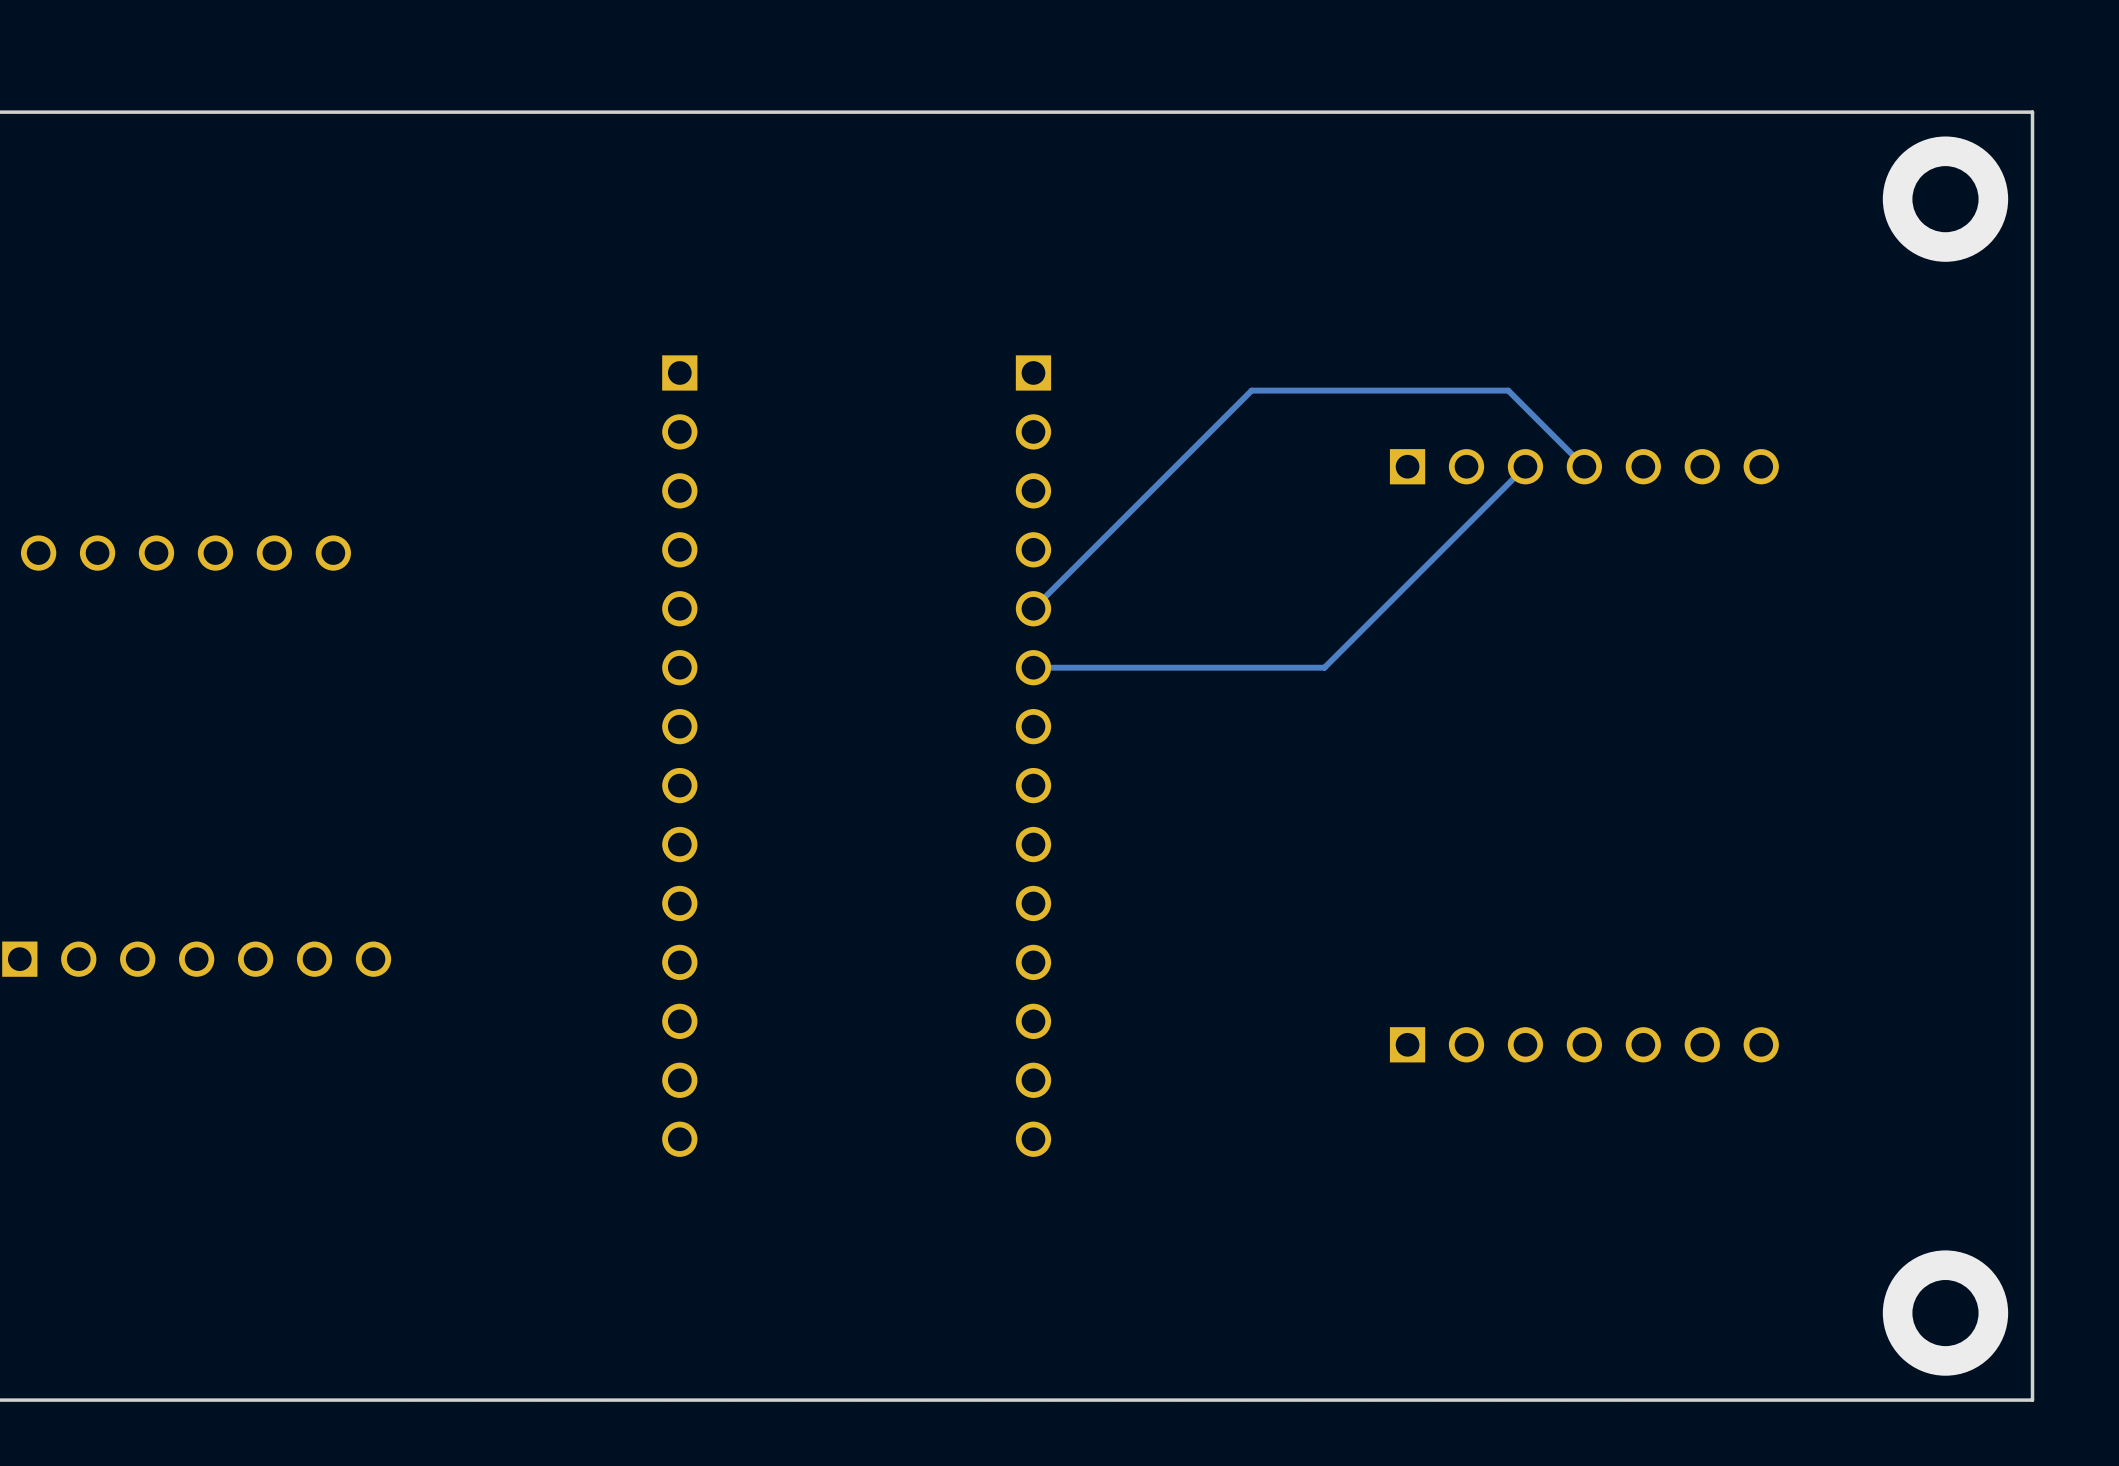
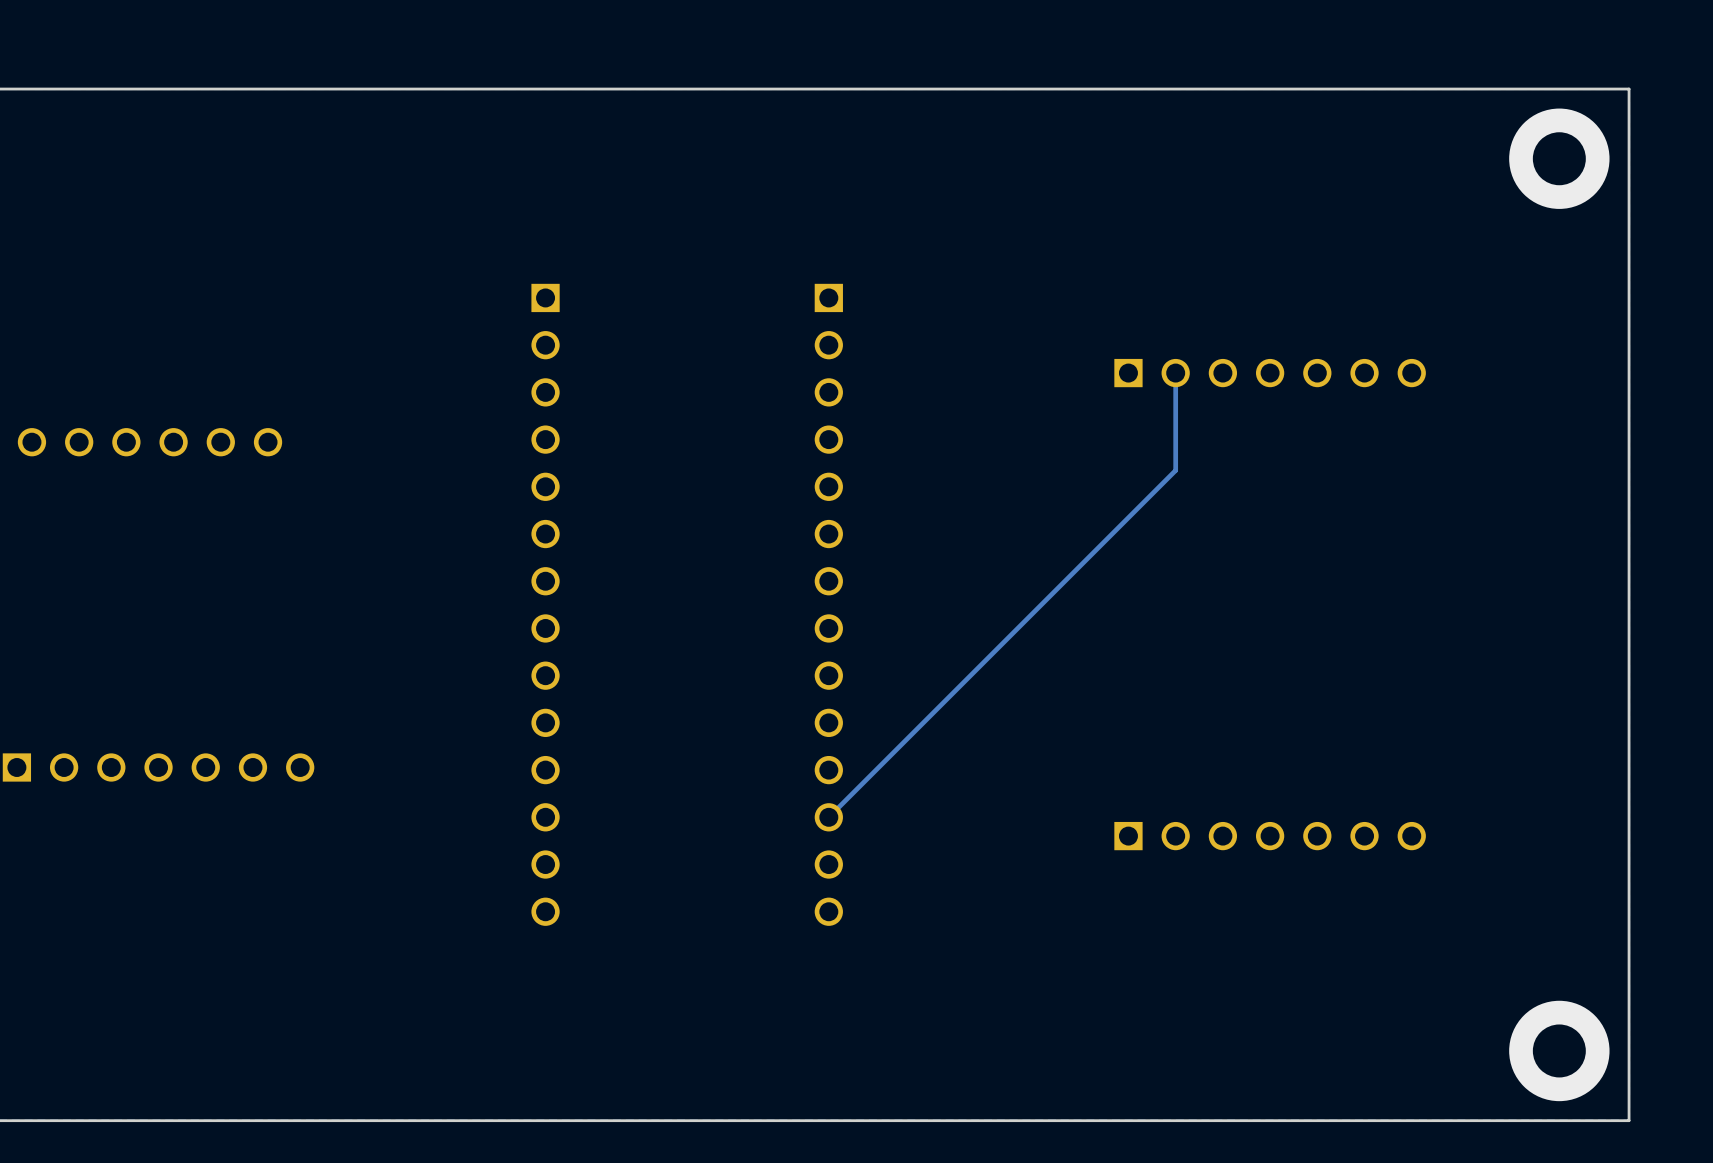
track: none -> (1175, 373) (1175, 470) (828, 817)
track: (1525, 466) (1324, 667) (1033, 667) -> none
track: (1584, 466) (1508, 390) (1251, 390) (1033, 608) -> none

